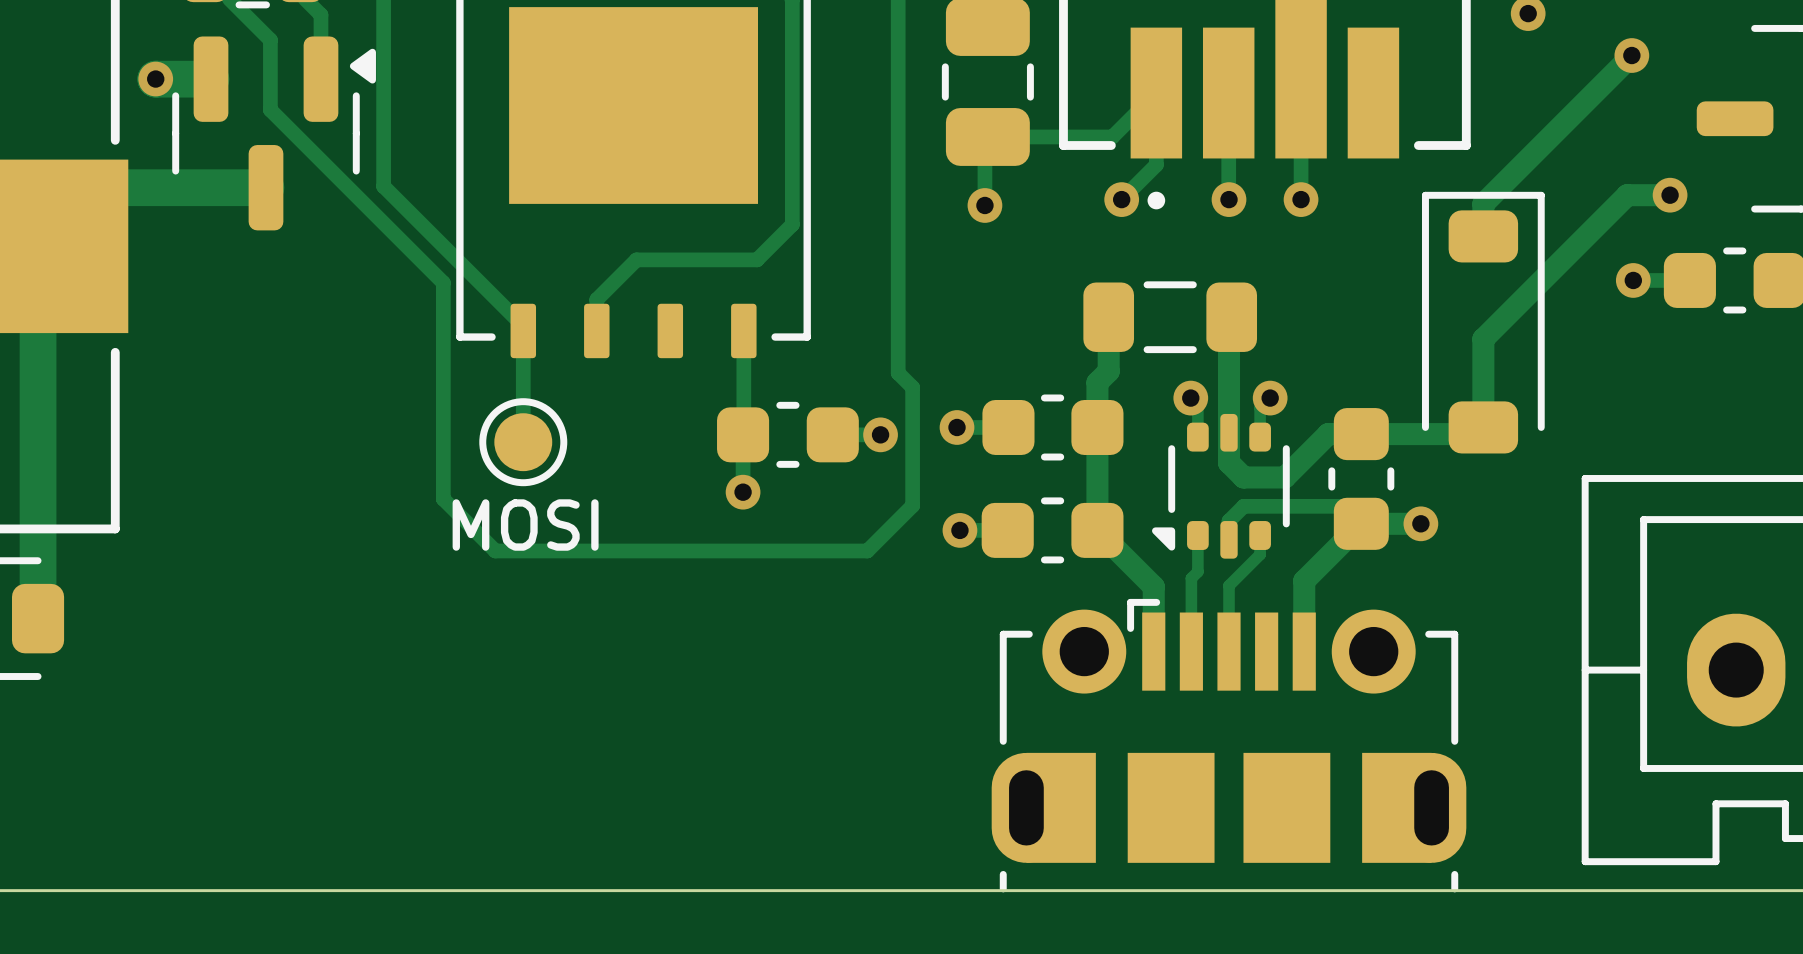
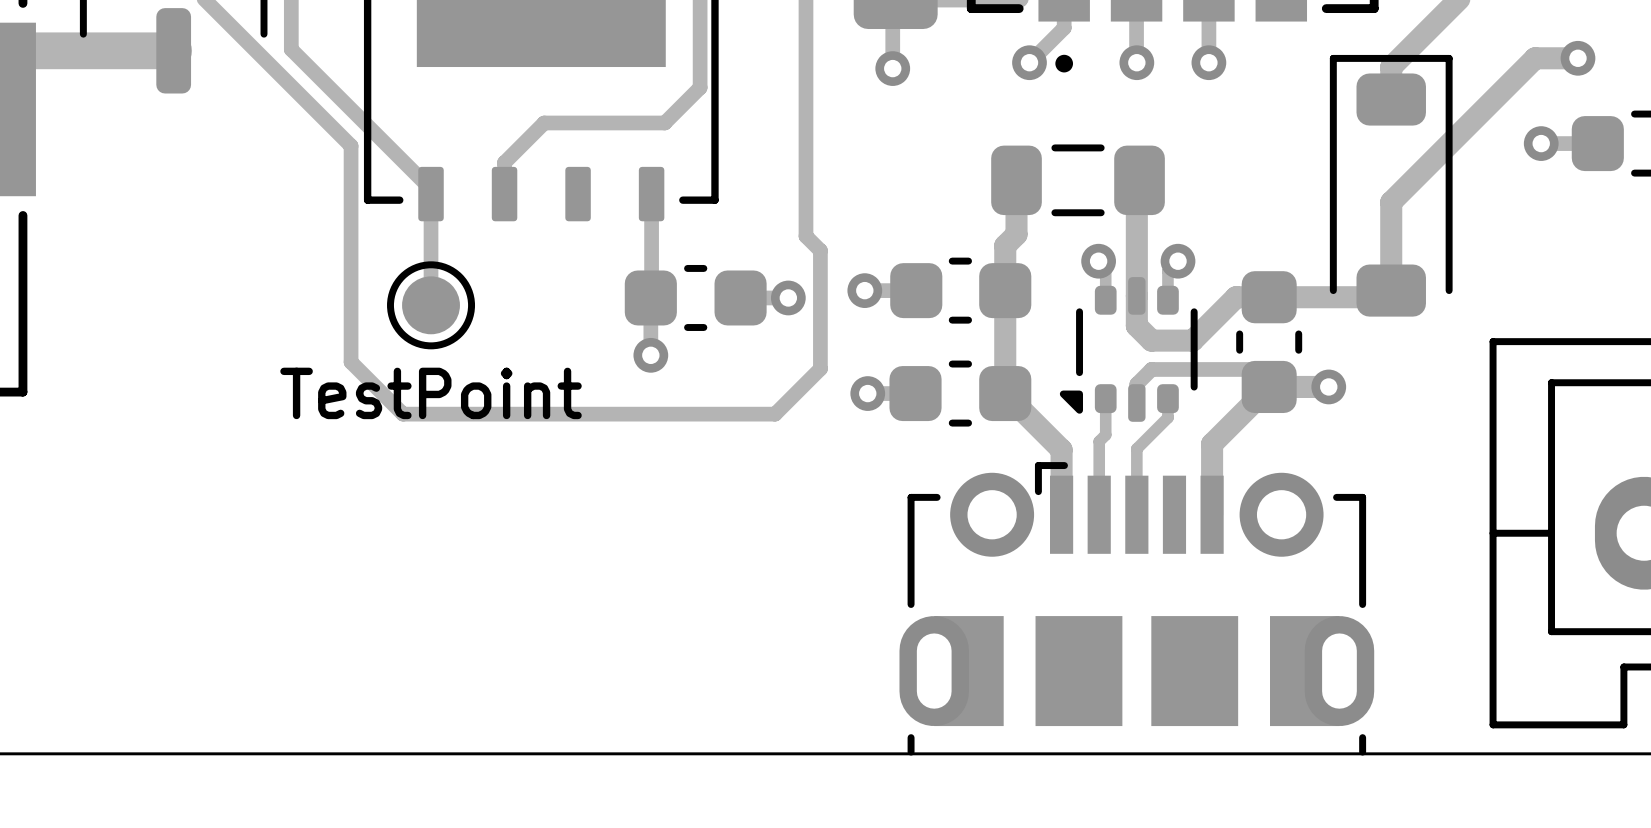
text: MOSI (525, 525) -> none
part value: none -> TestPoint (431, 393)

